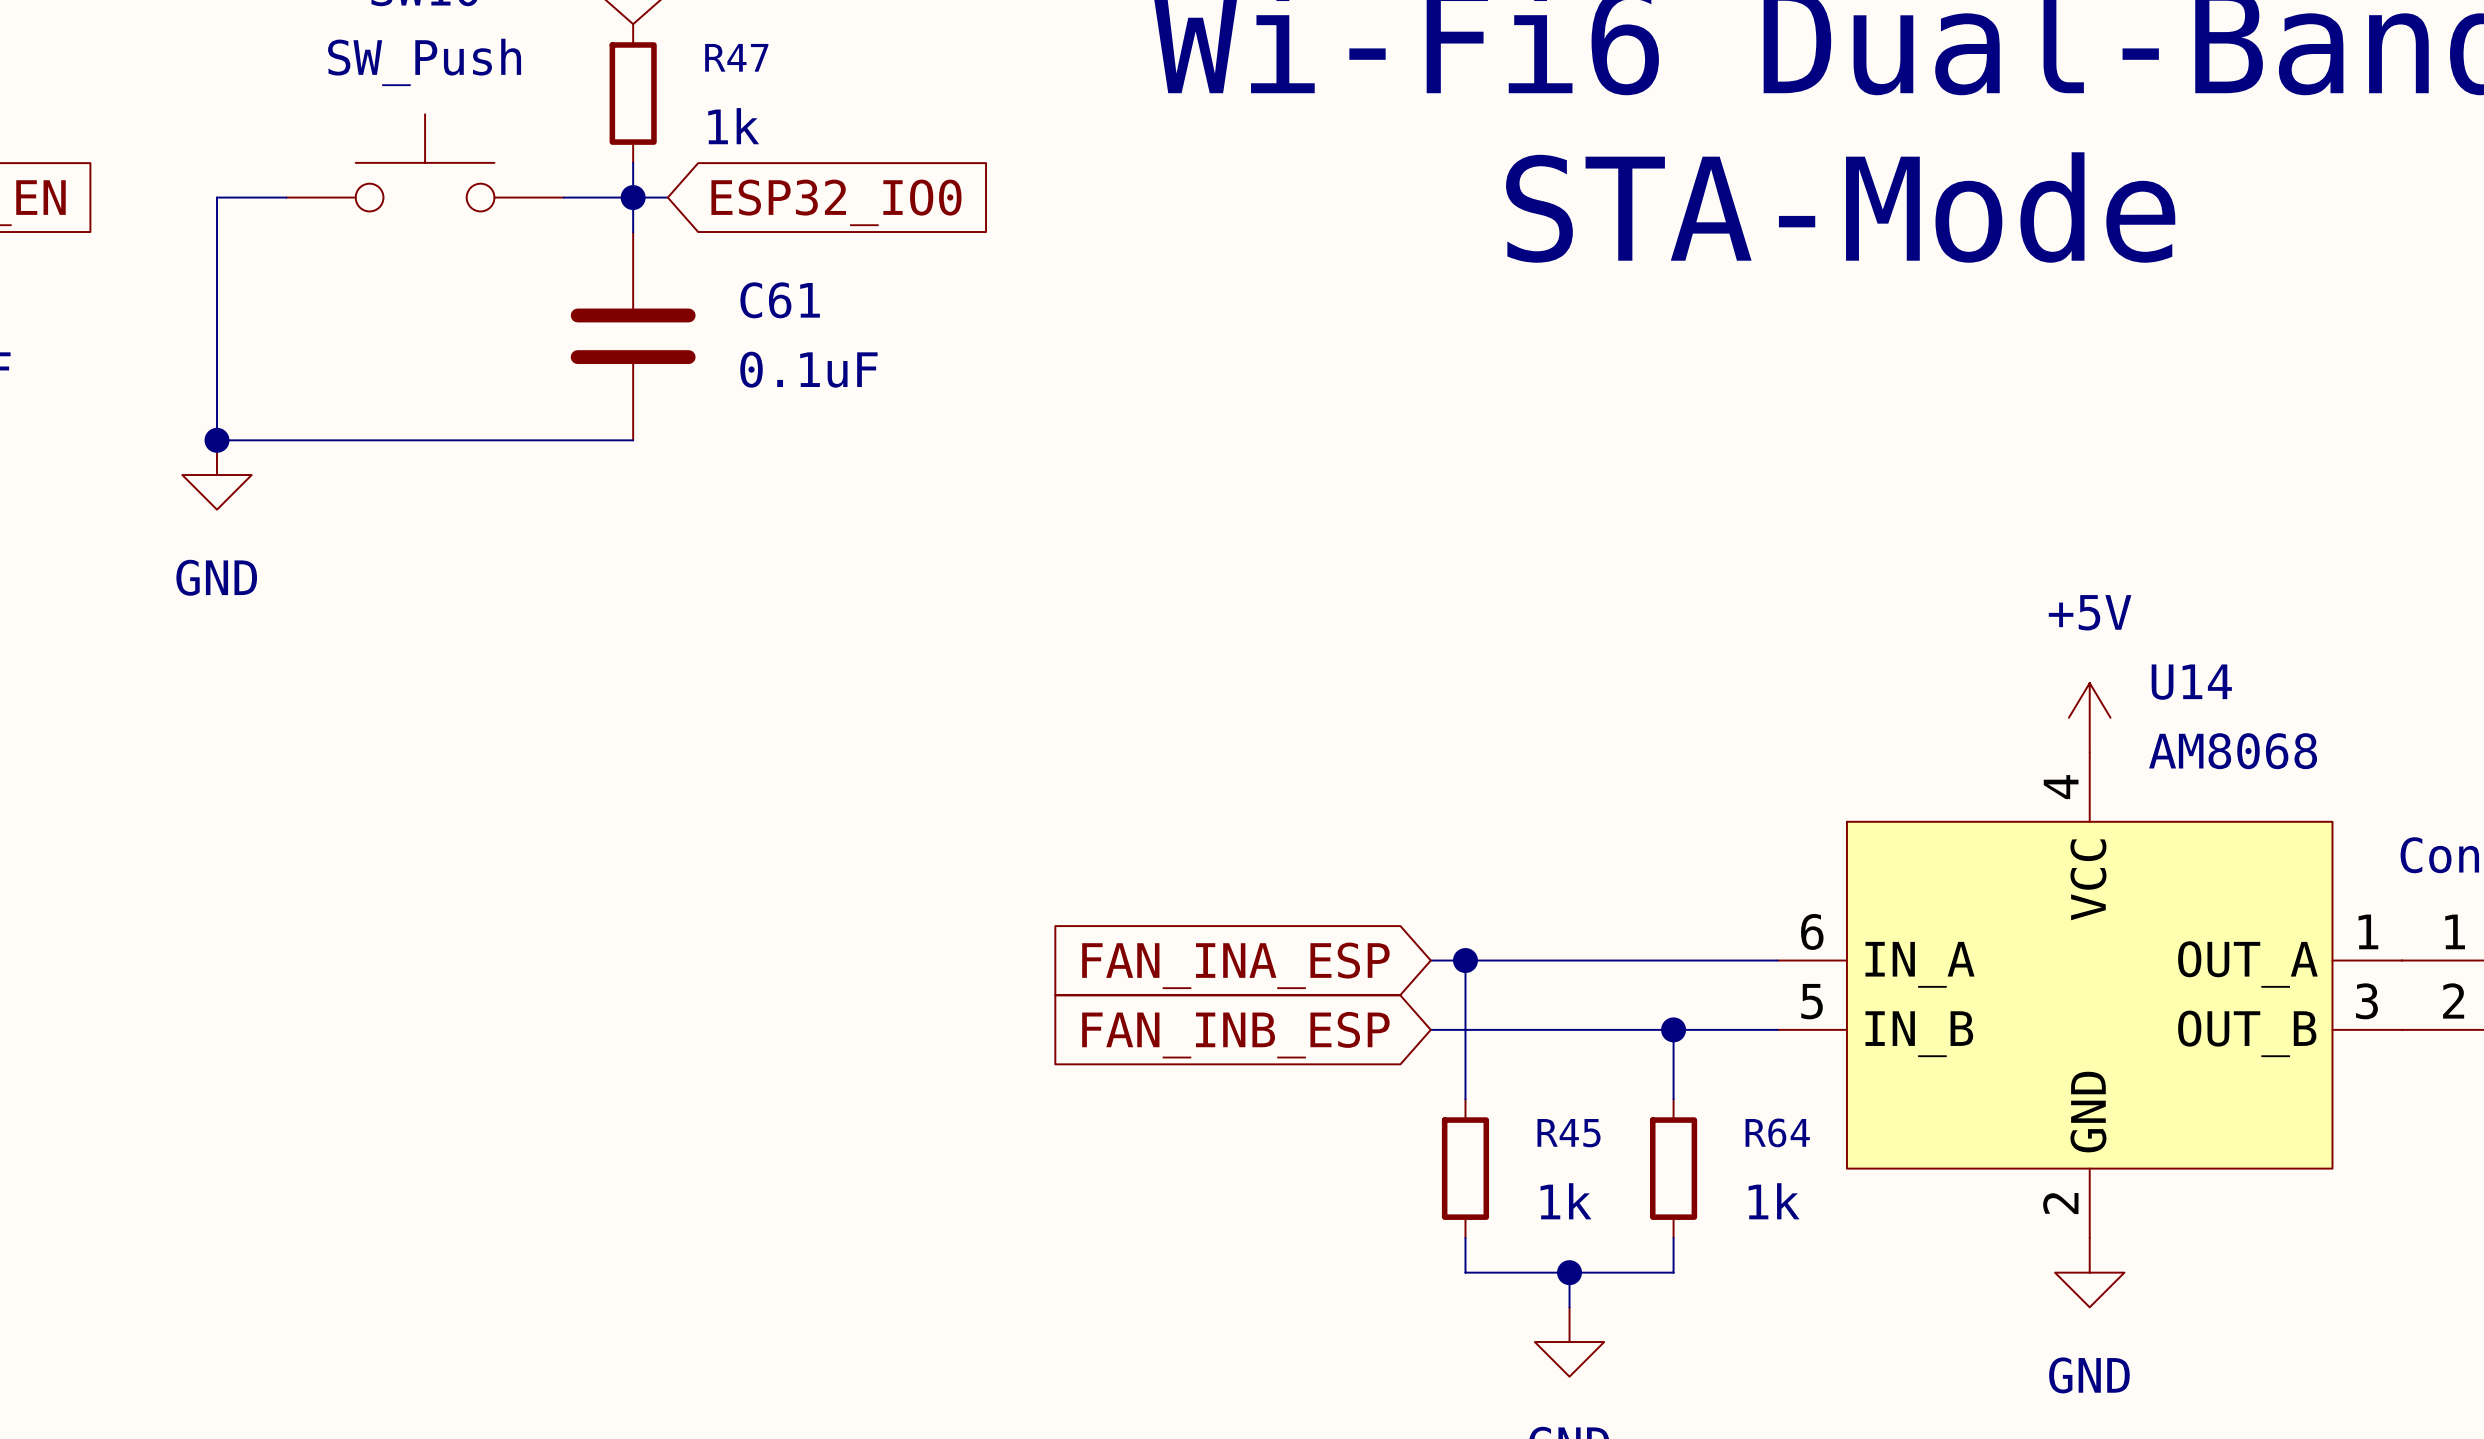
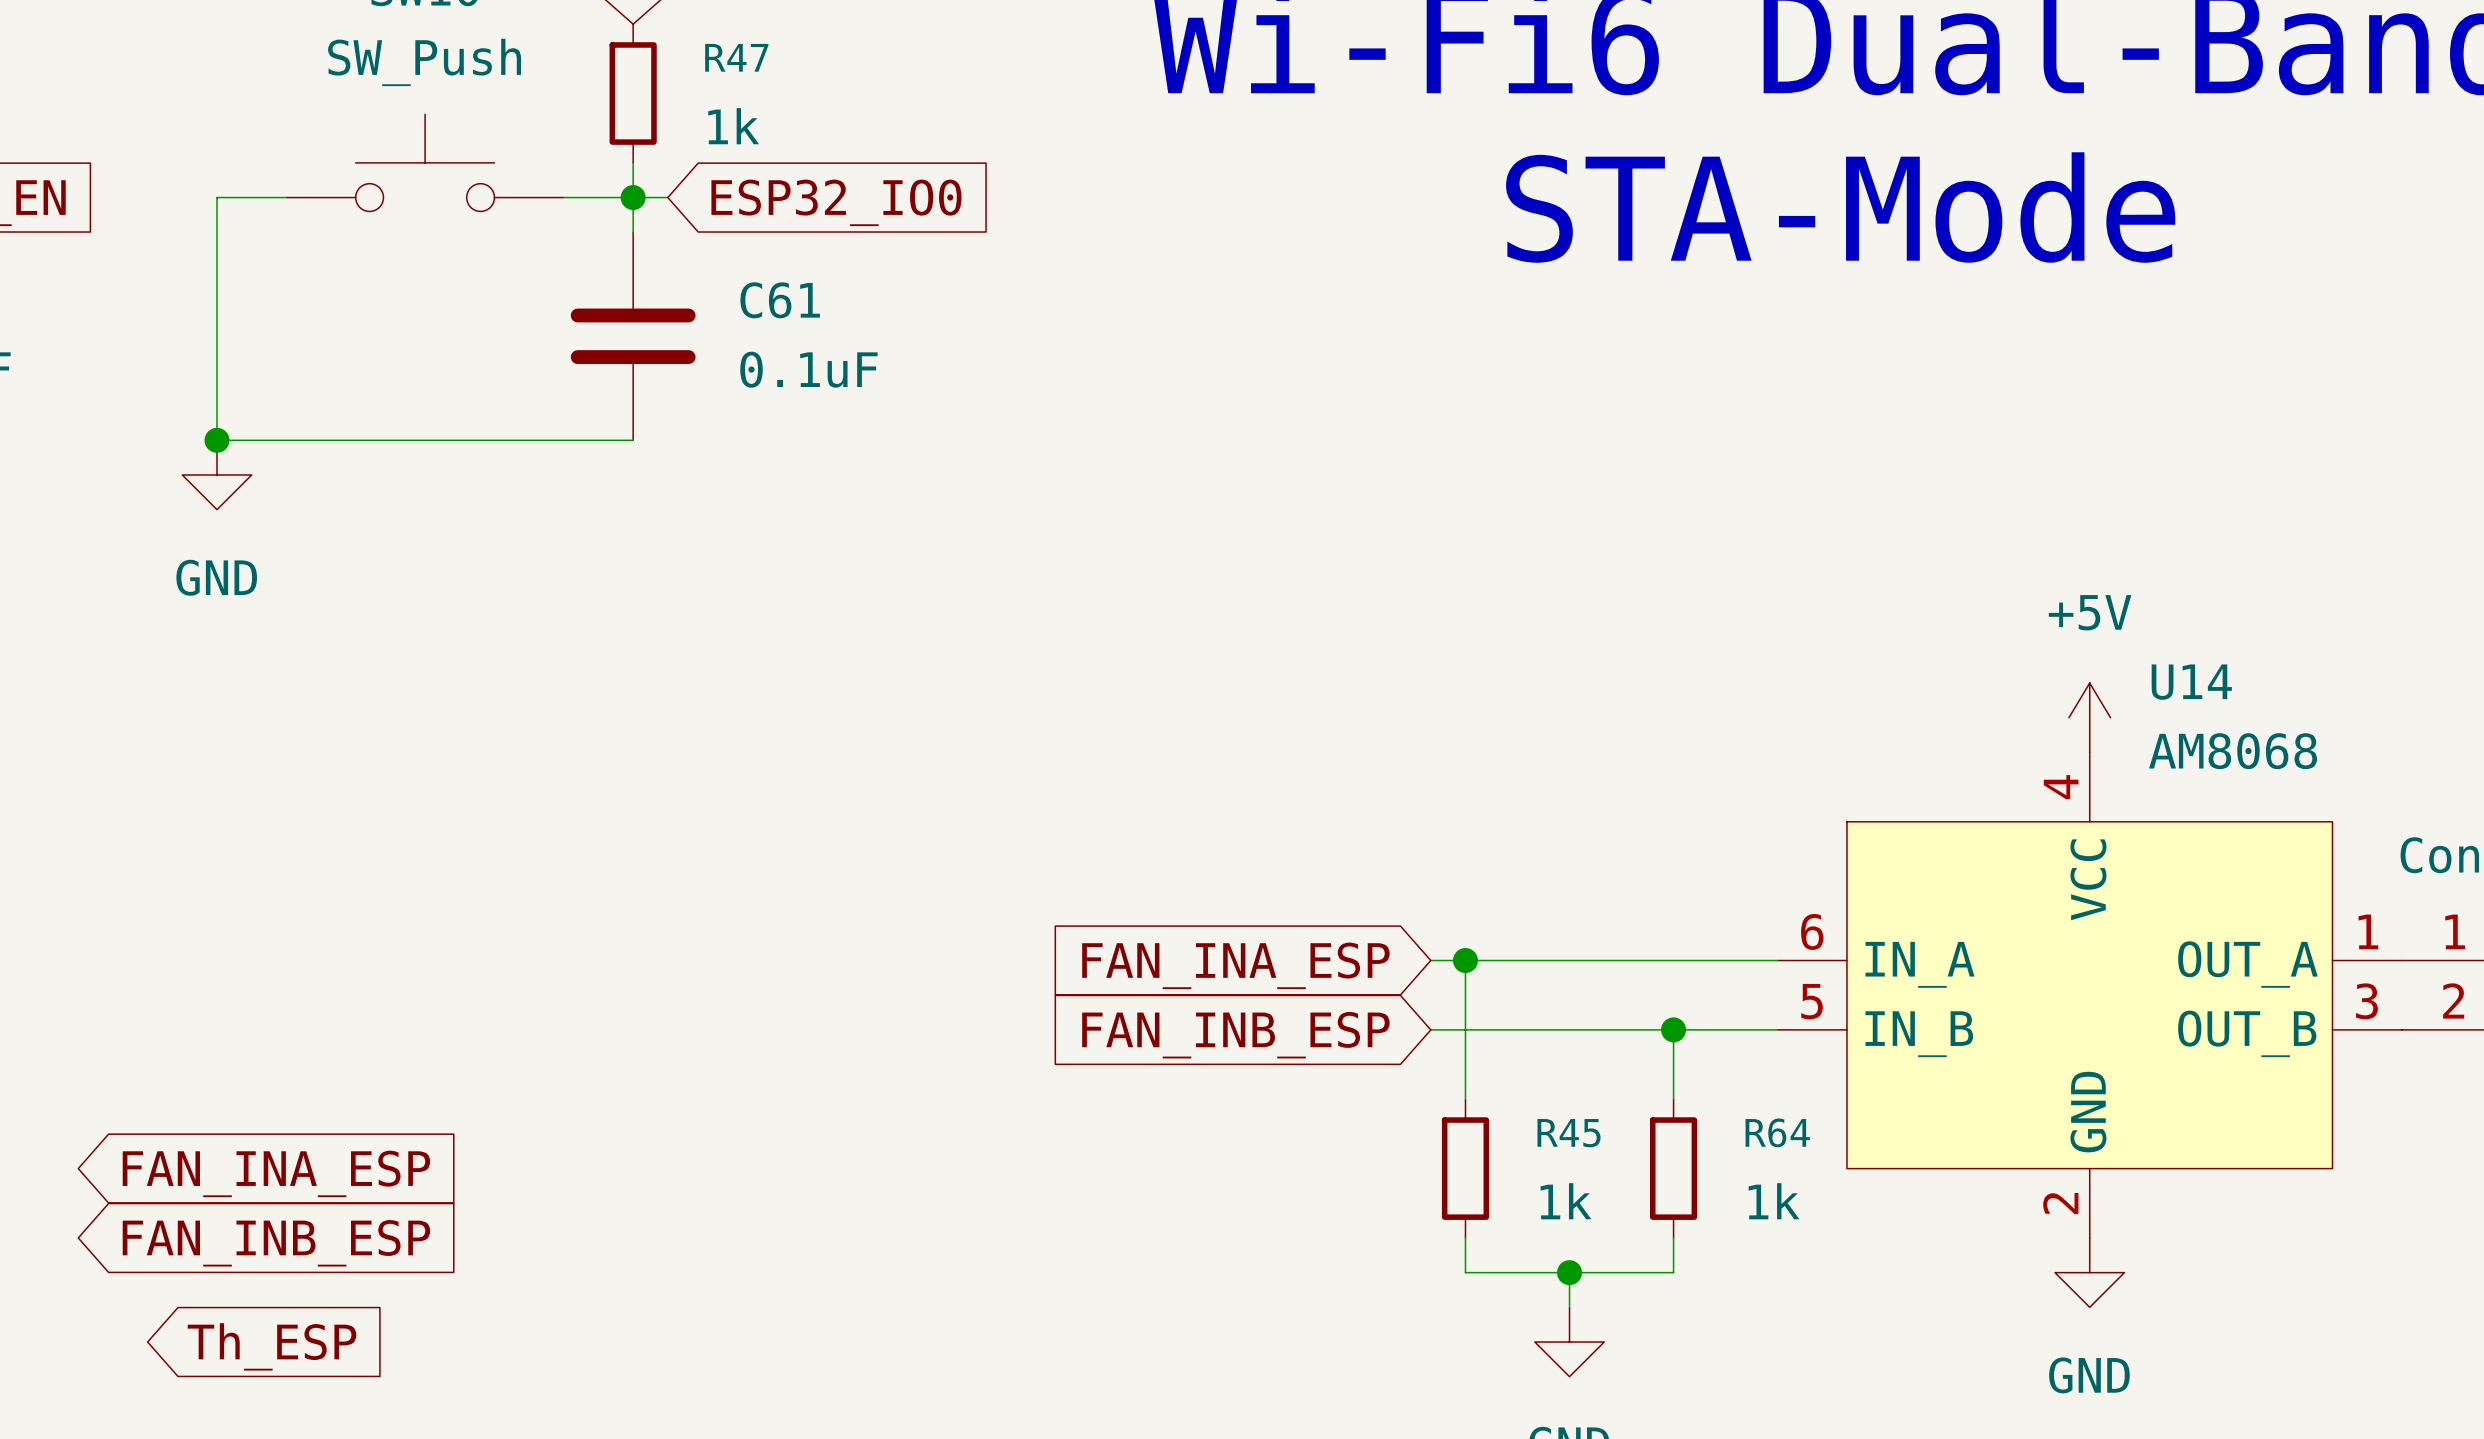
global label: none -> FAN_INA_ESP (276, 1173)
global label: none -> FAN_INB_ESP (276, 1243)
global label: none -> Th_ESP (272, 1346)

